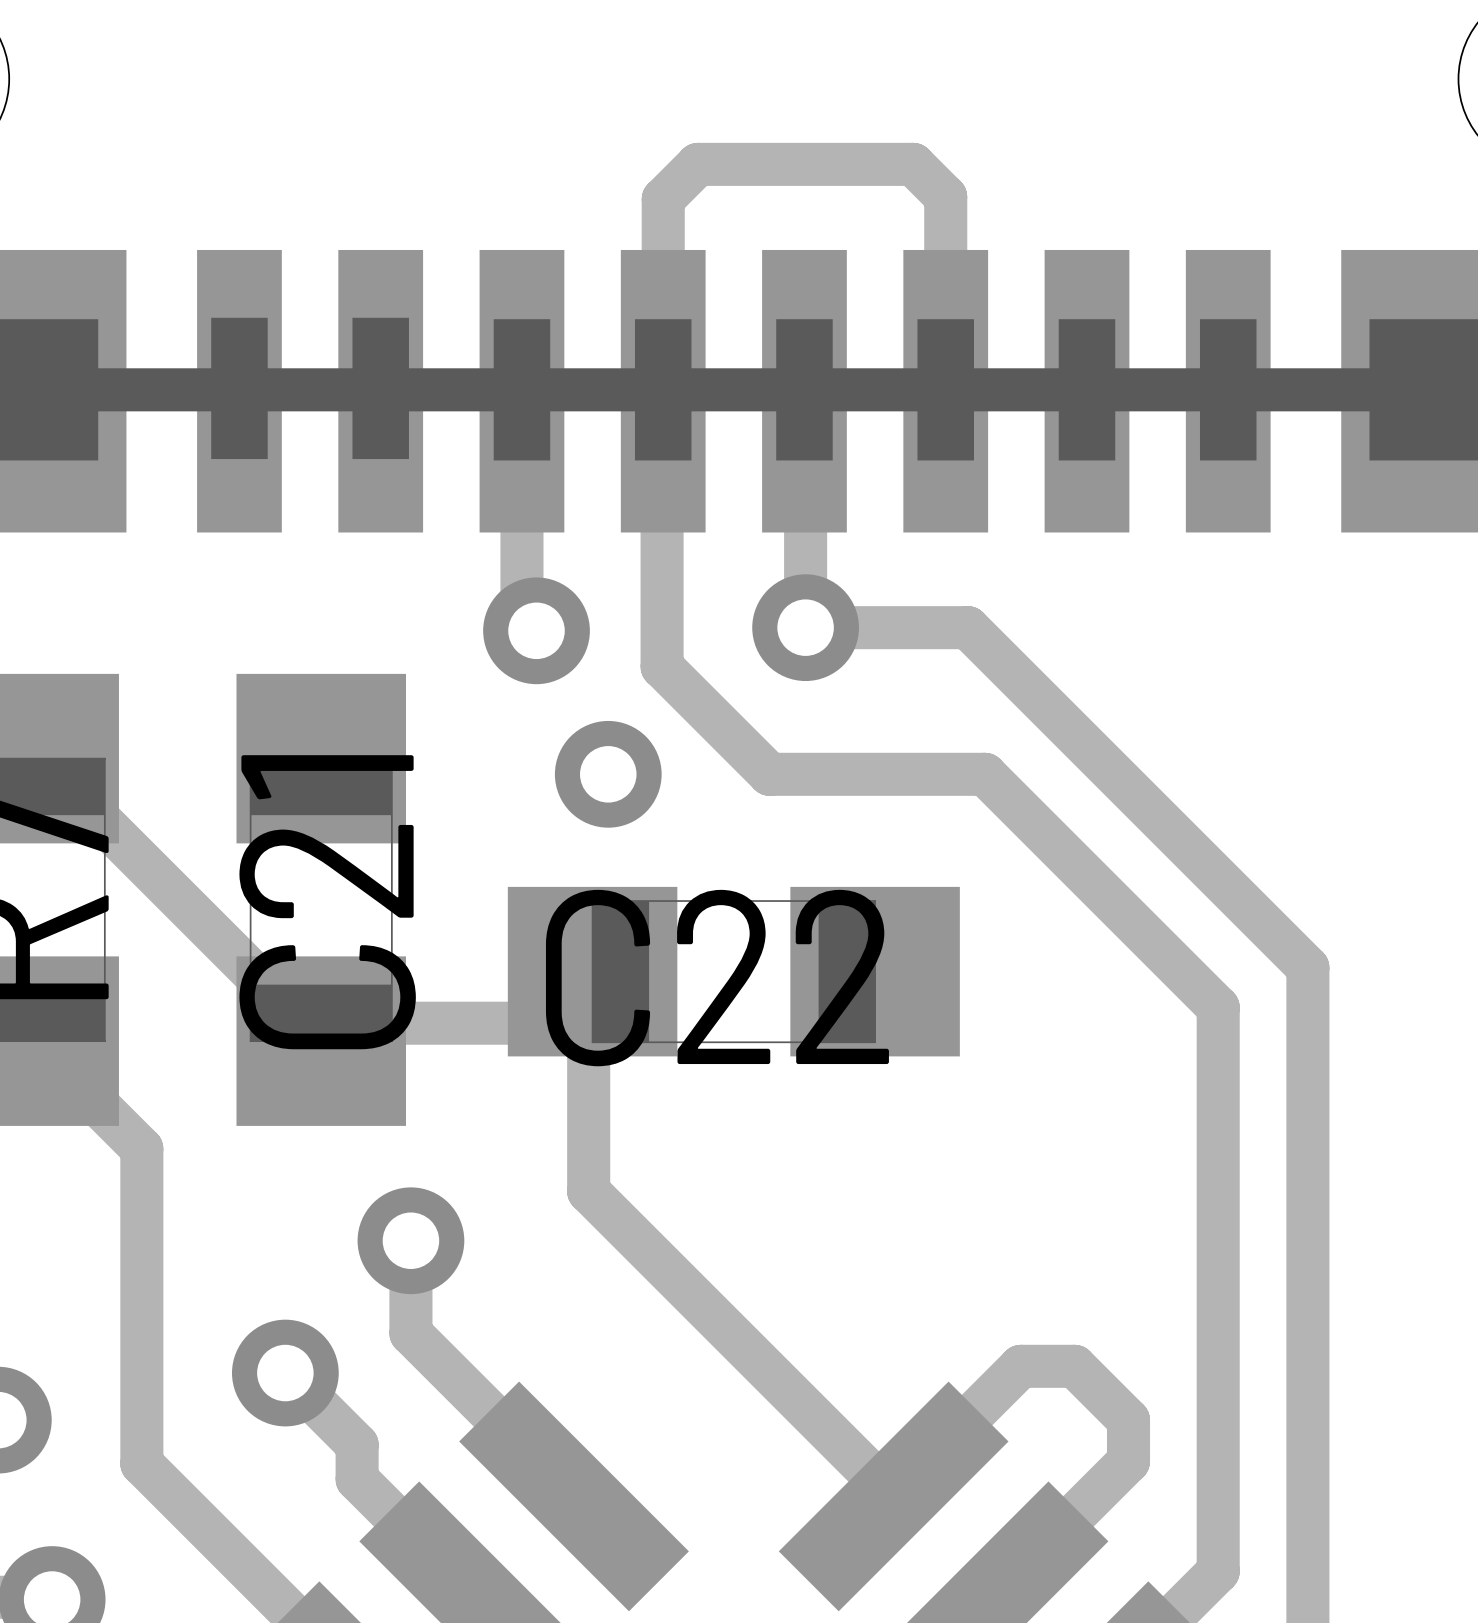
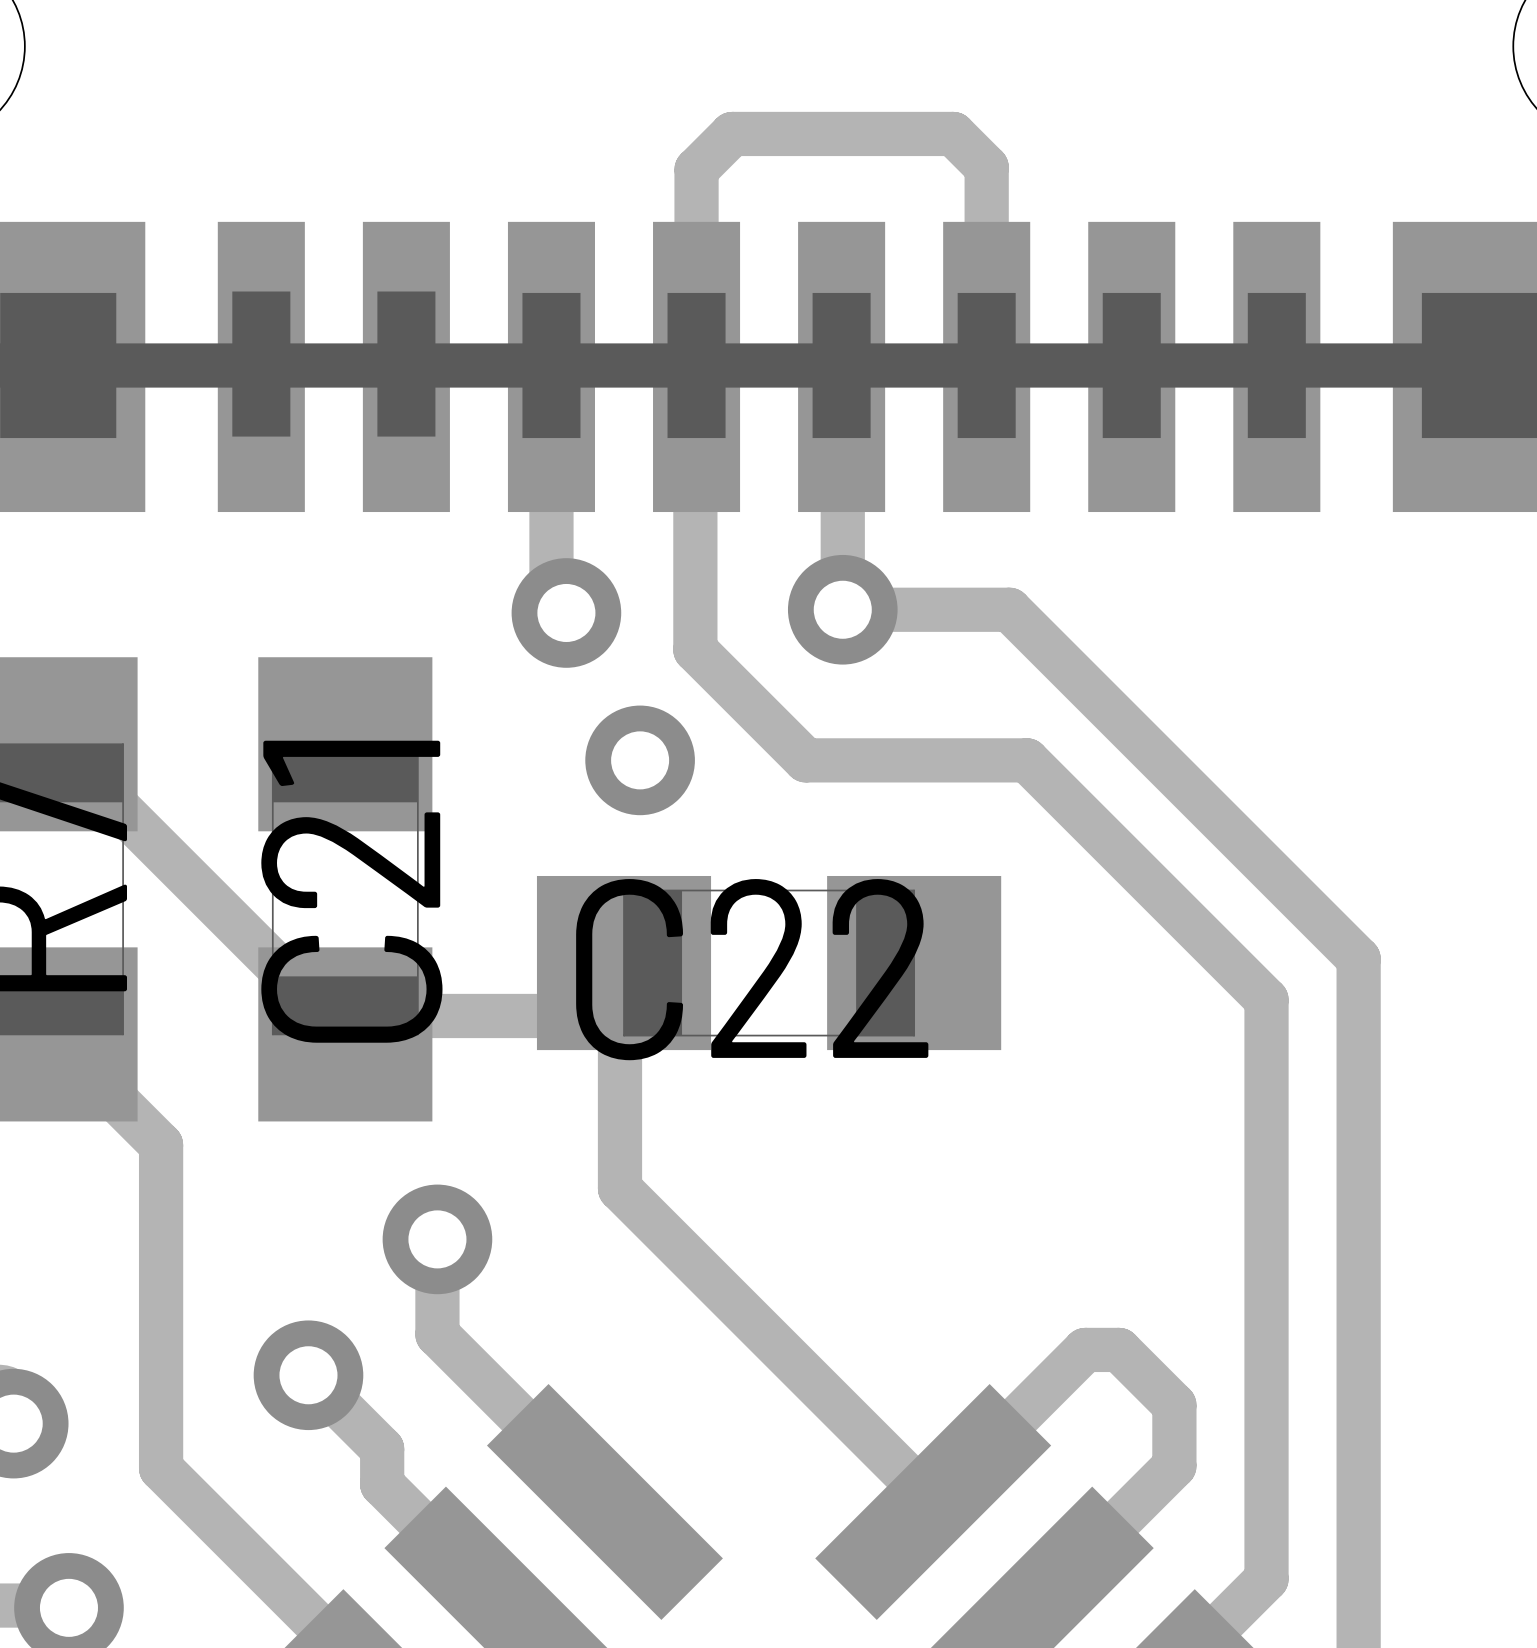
track: (1128, 1420) (1074, 1366) (1020, 1366) (893, 1493) -> (1174, 1423) (1174, 1405) (1119, 1349) (1085, 1349) (933, 1501)

